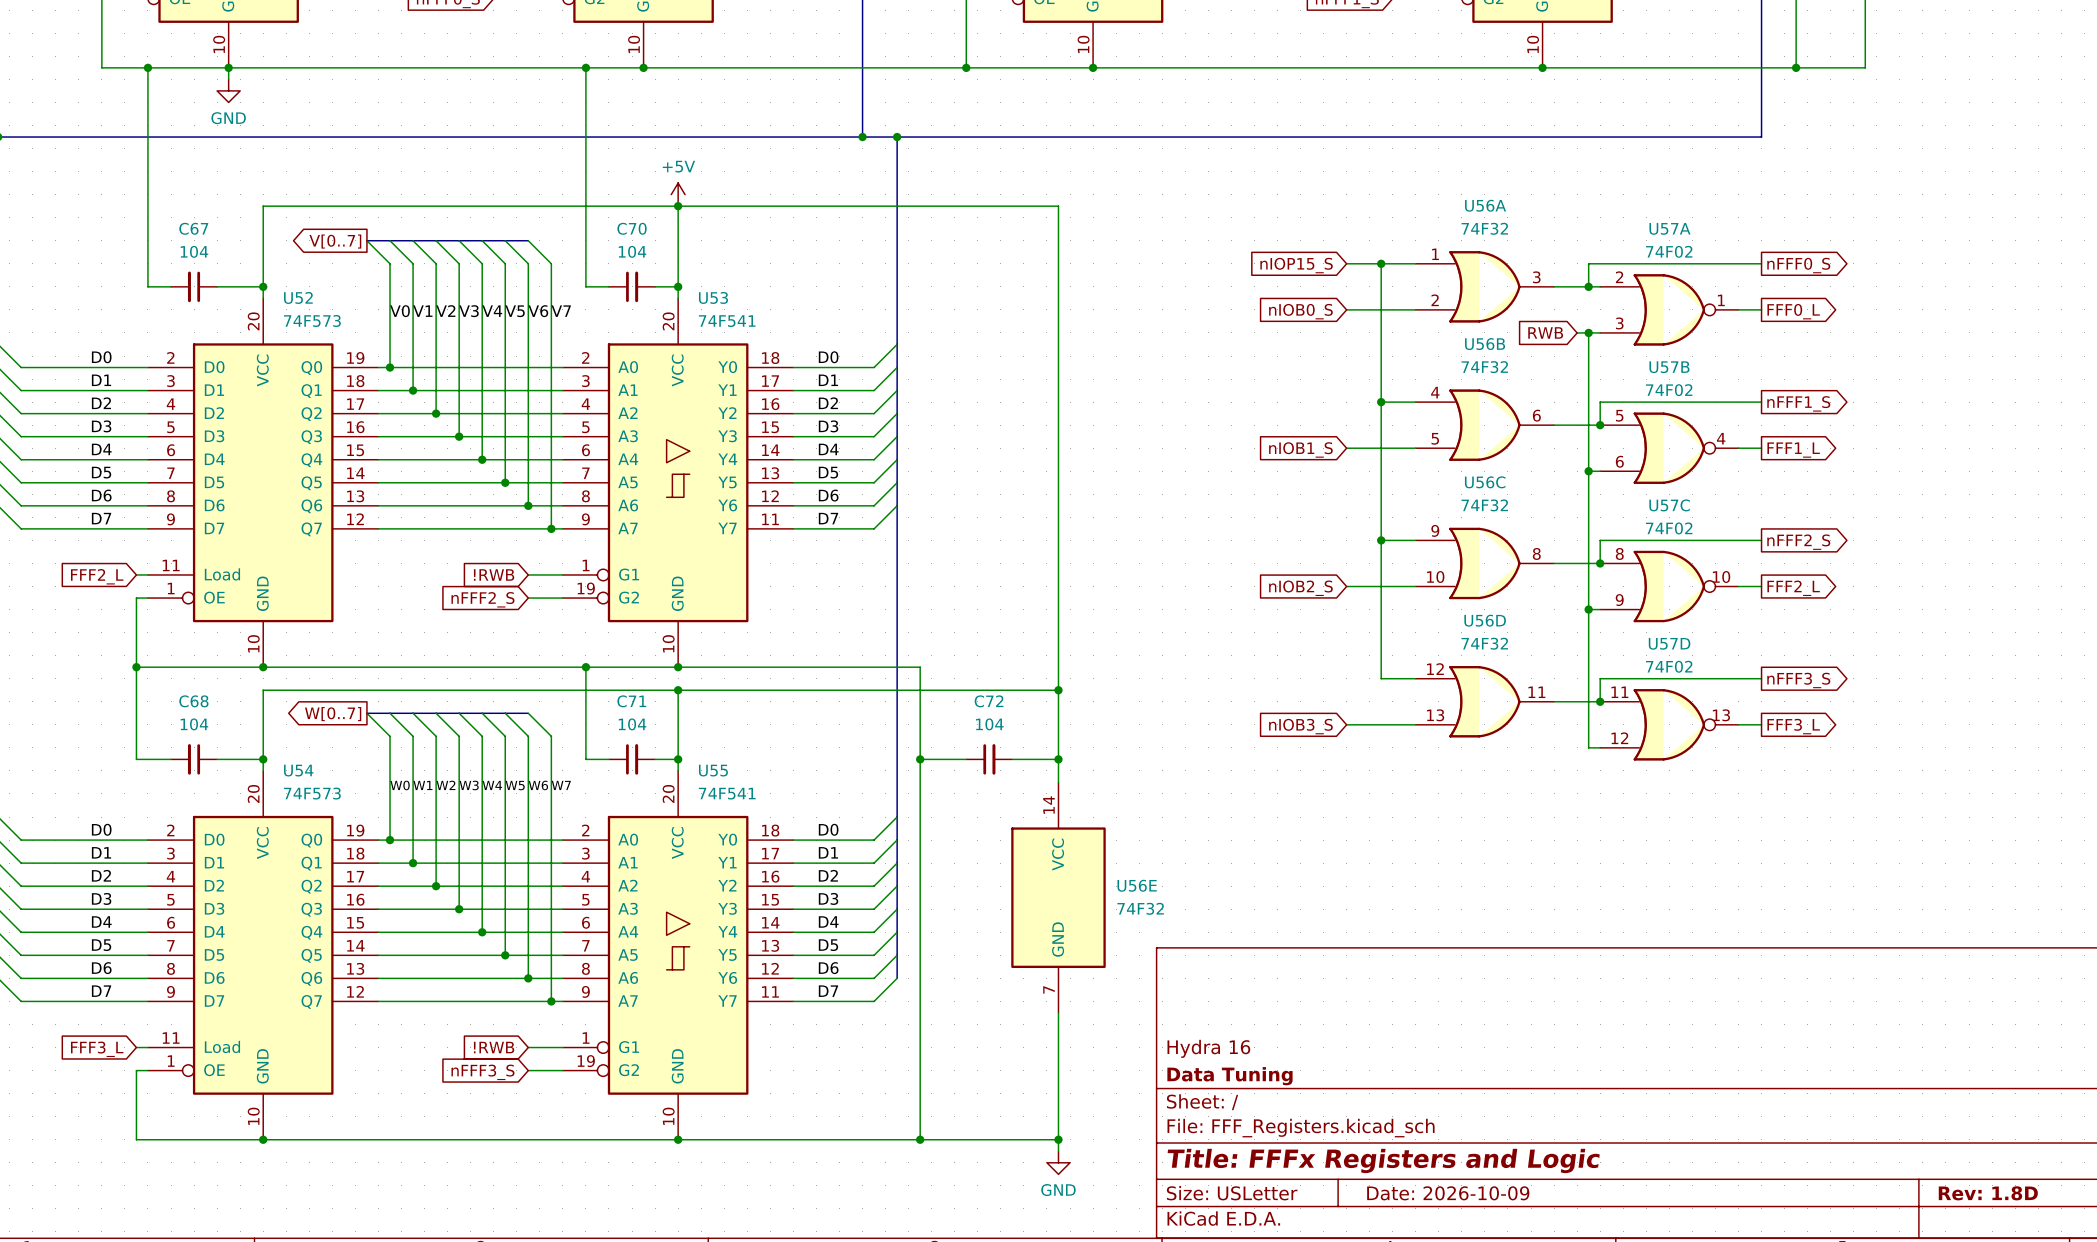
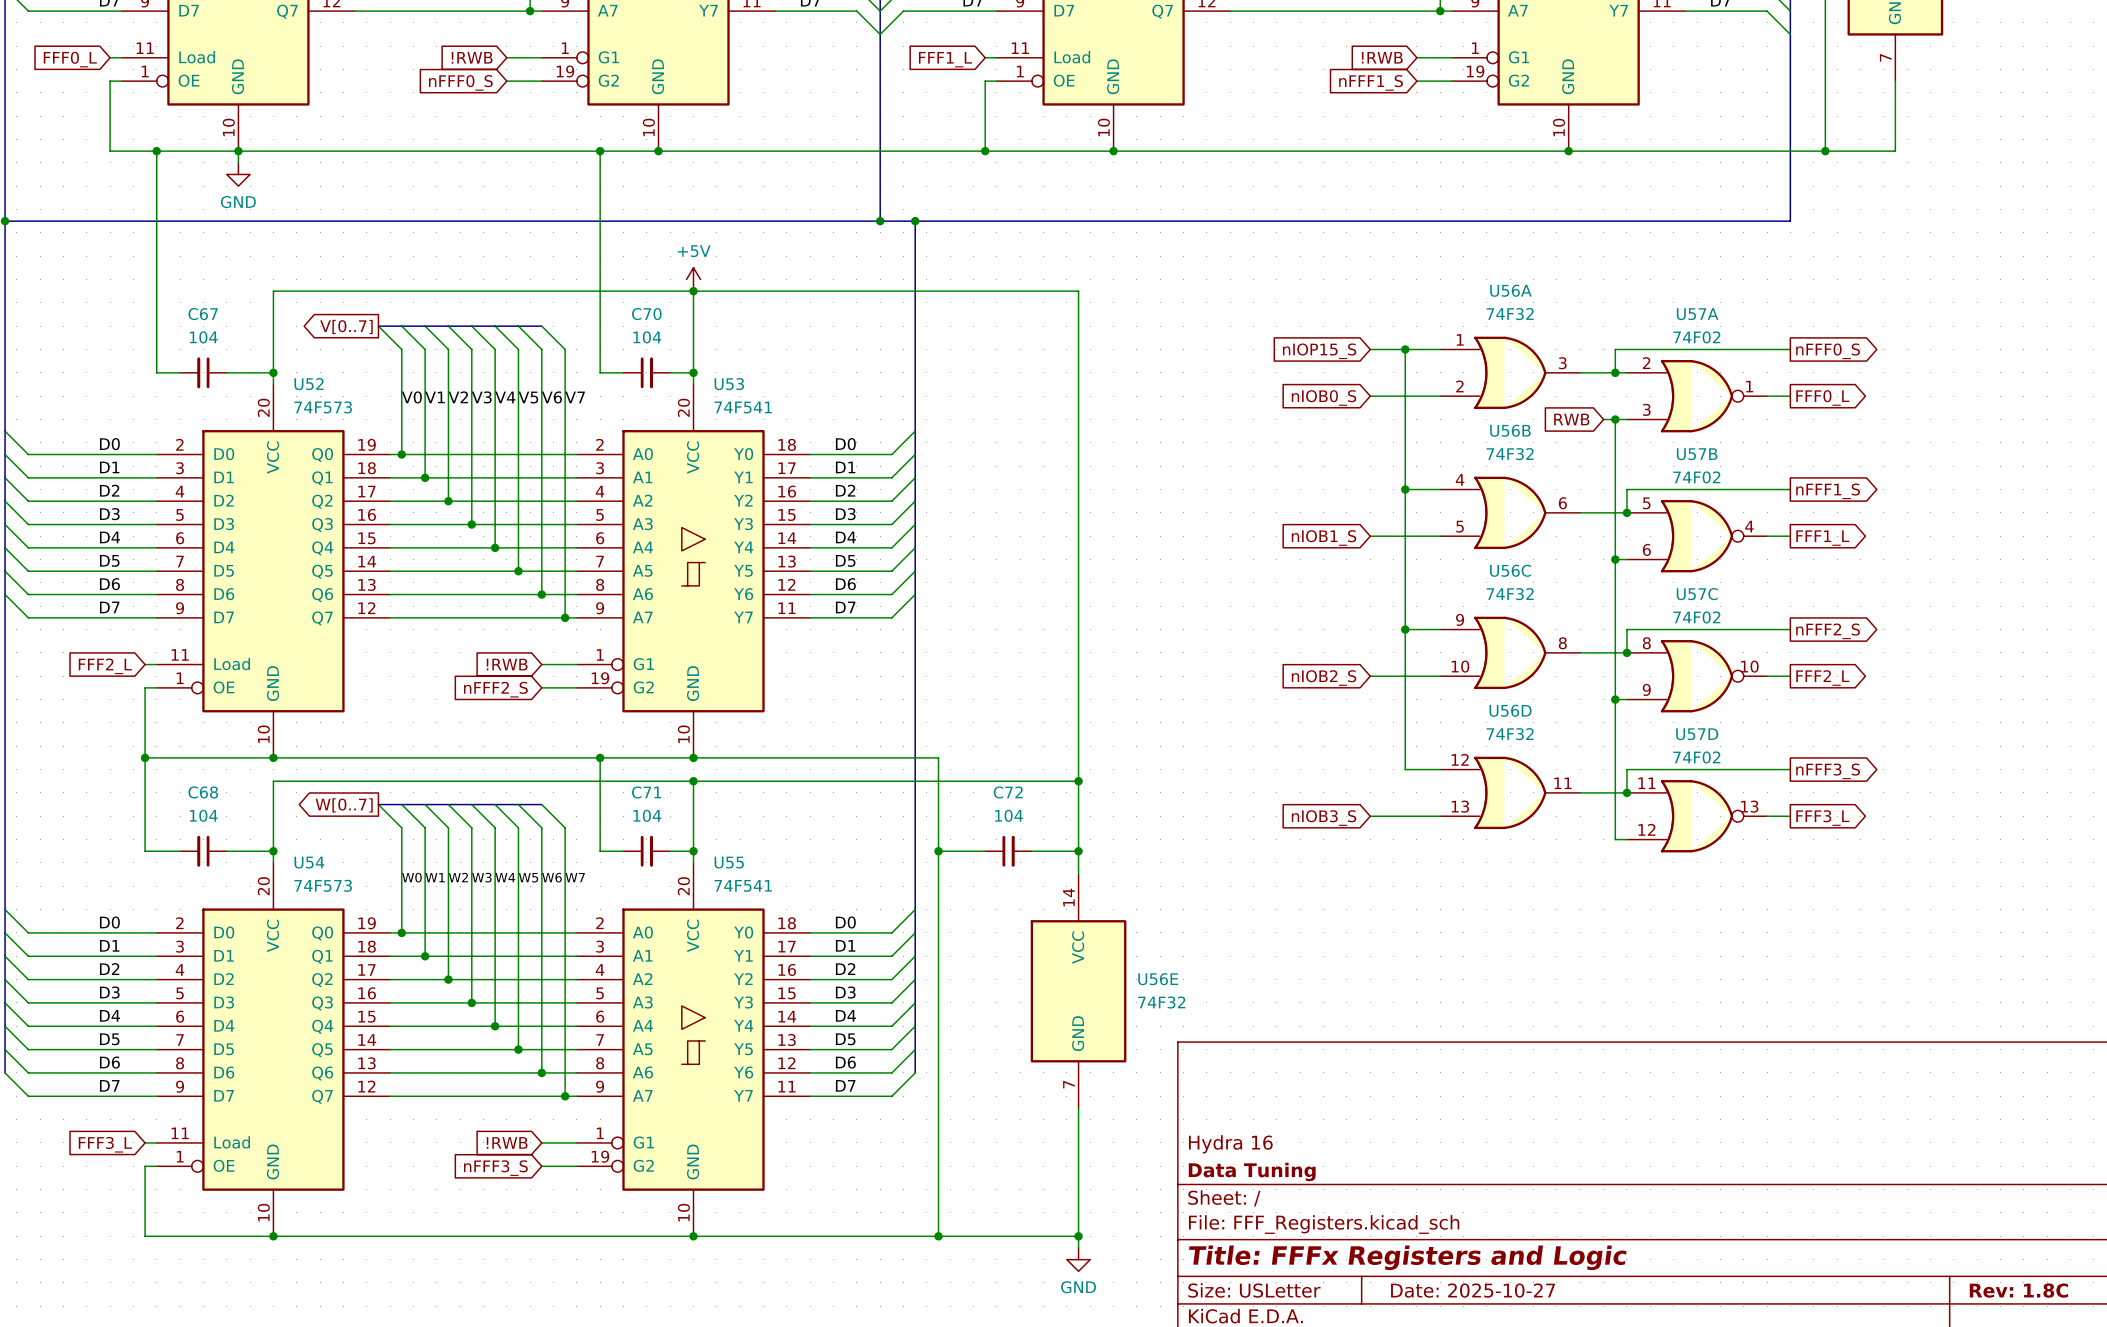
title block: Date: 2026-10-09 (1448, 1193) -> Date: 2025-10-27 (1473, 1290)
title block: Rev: 1.8D (1988, 1193) -> Rev: 1.8C (2018, 1290)

